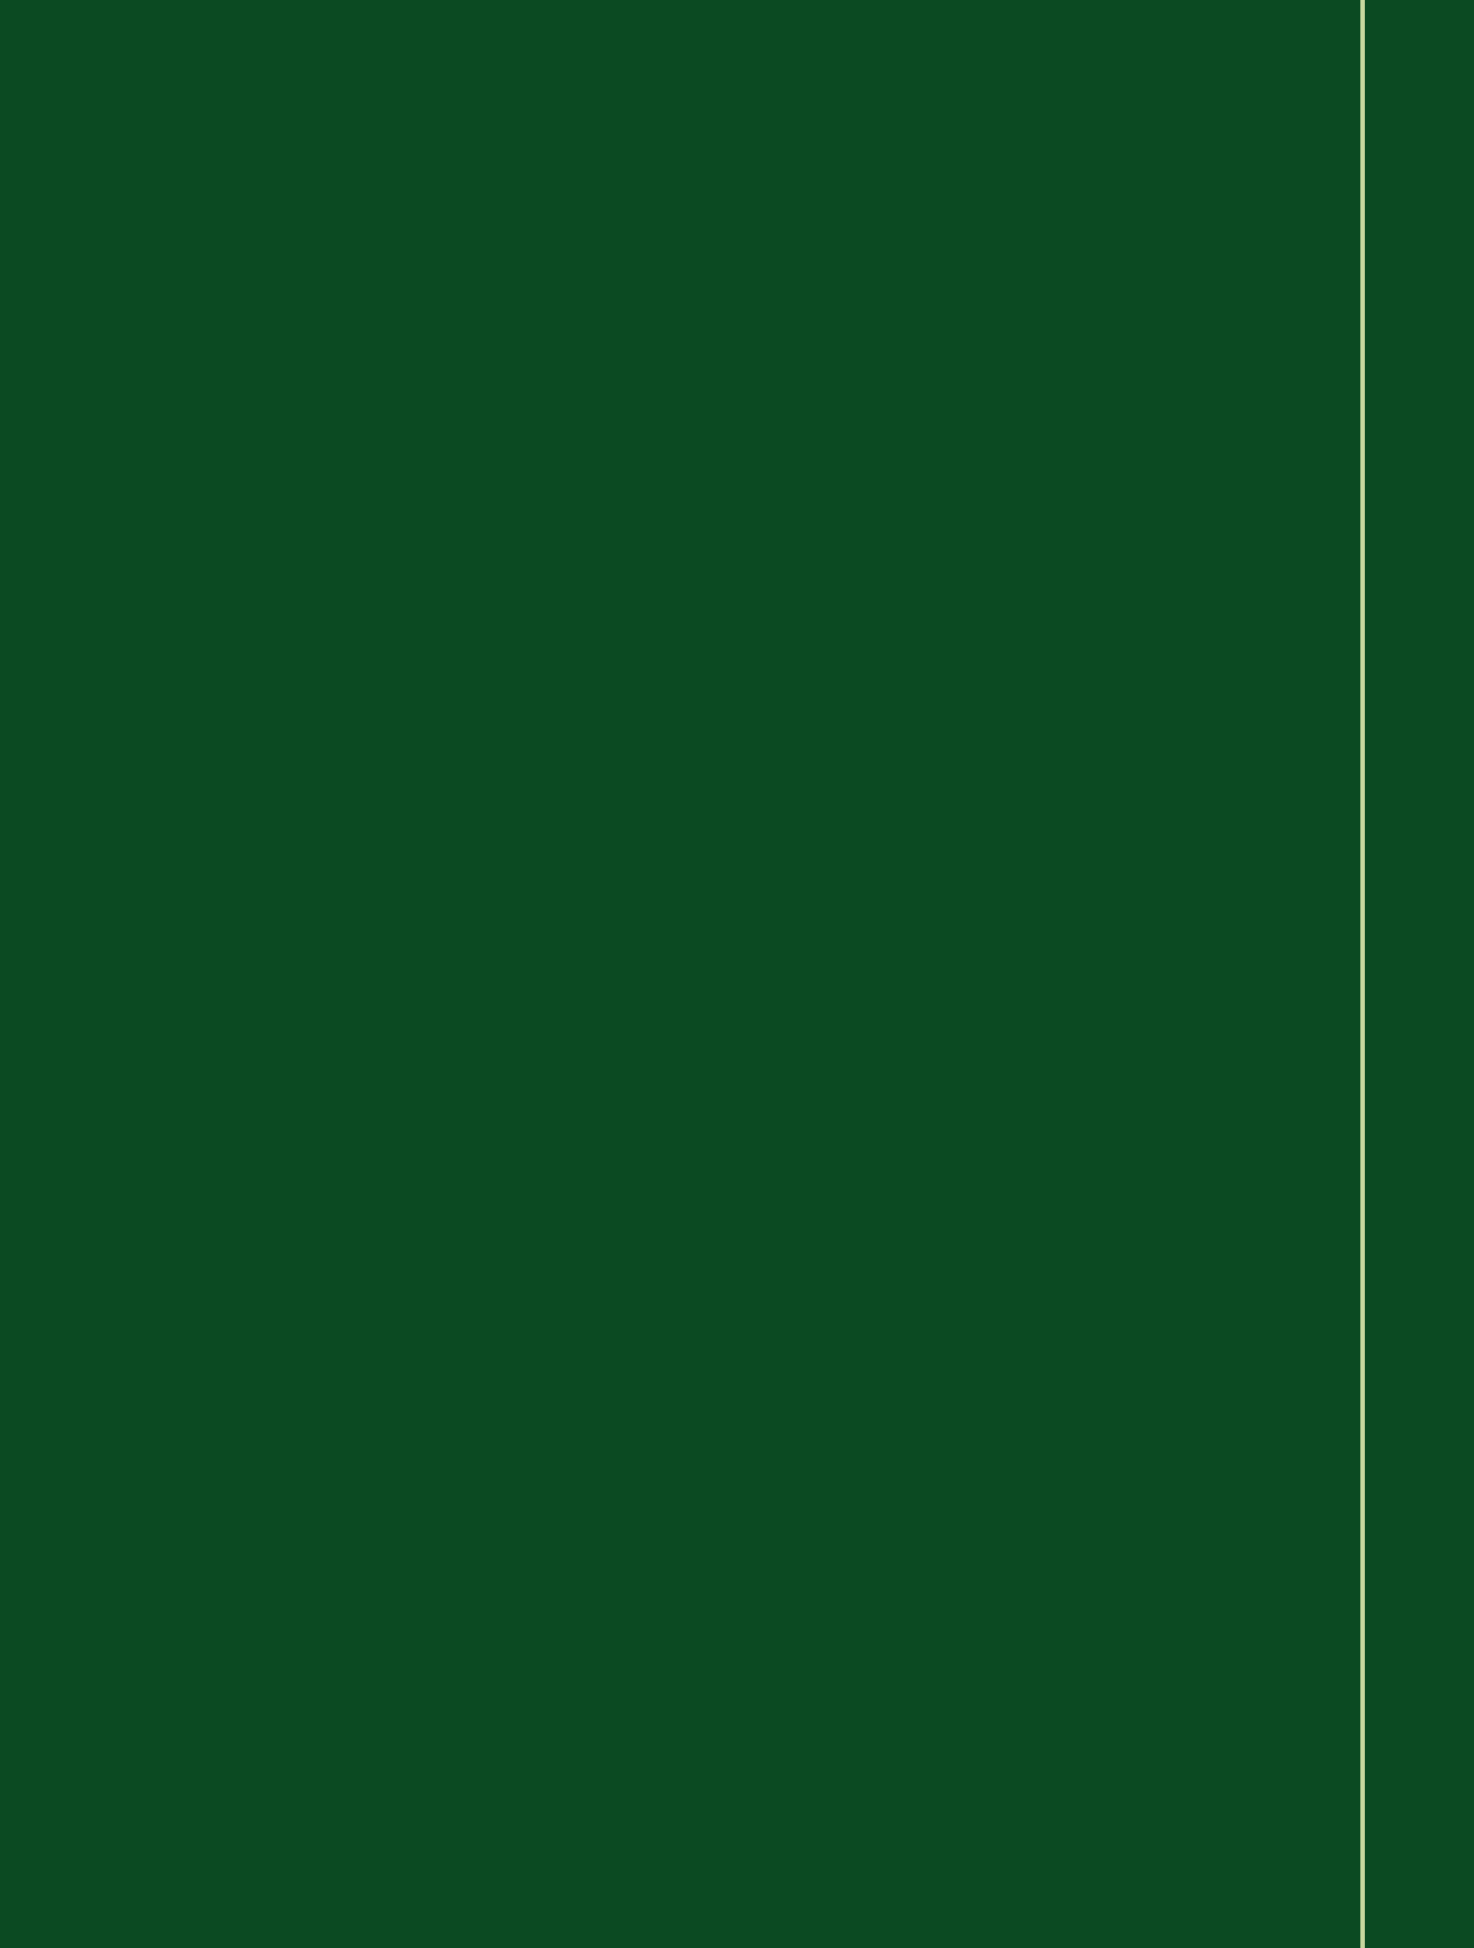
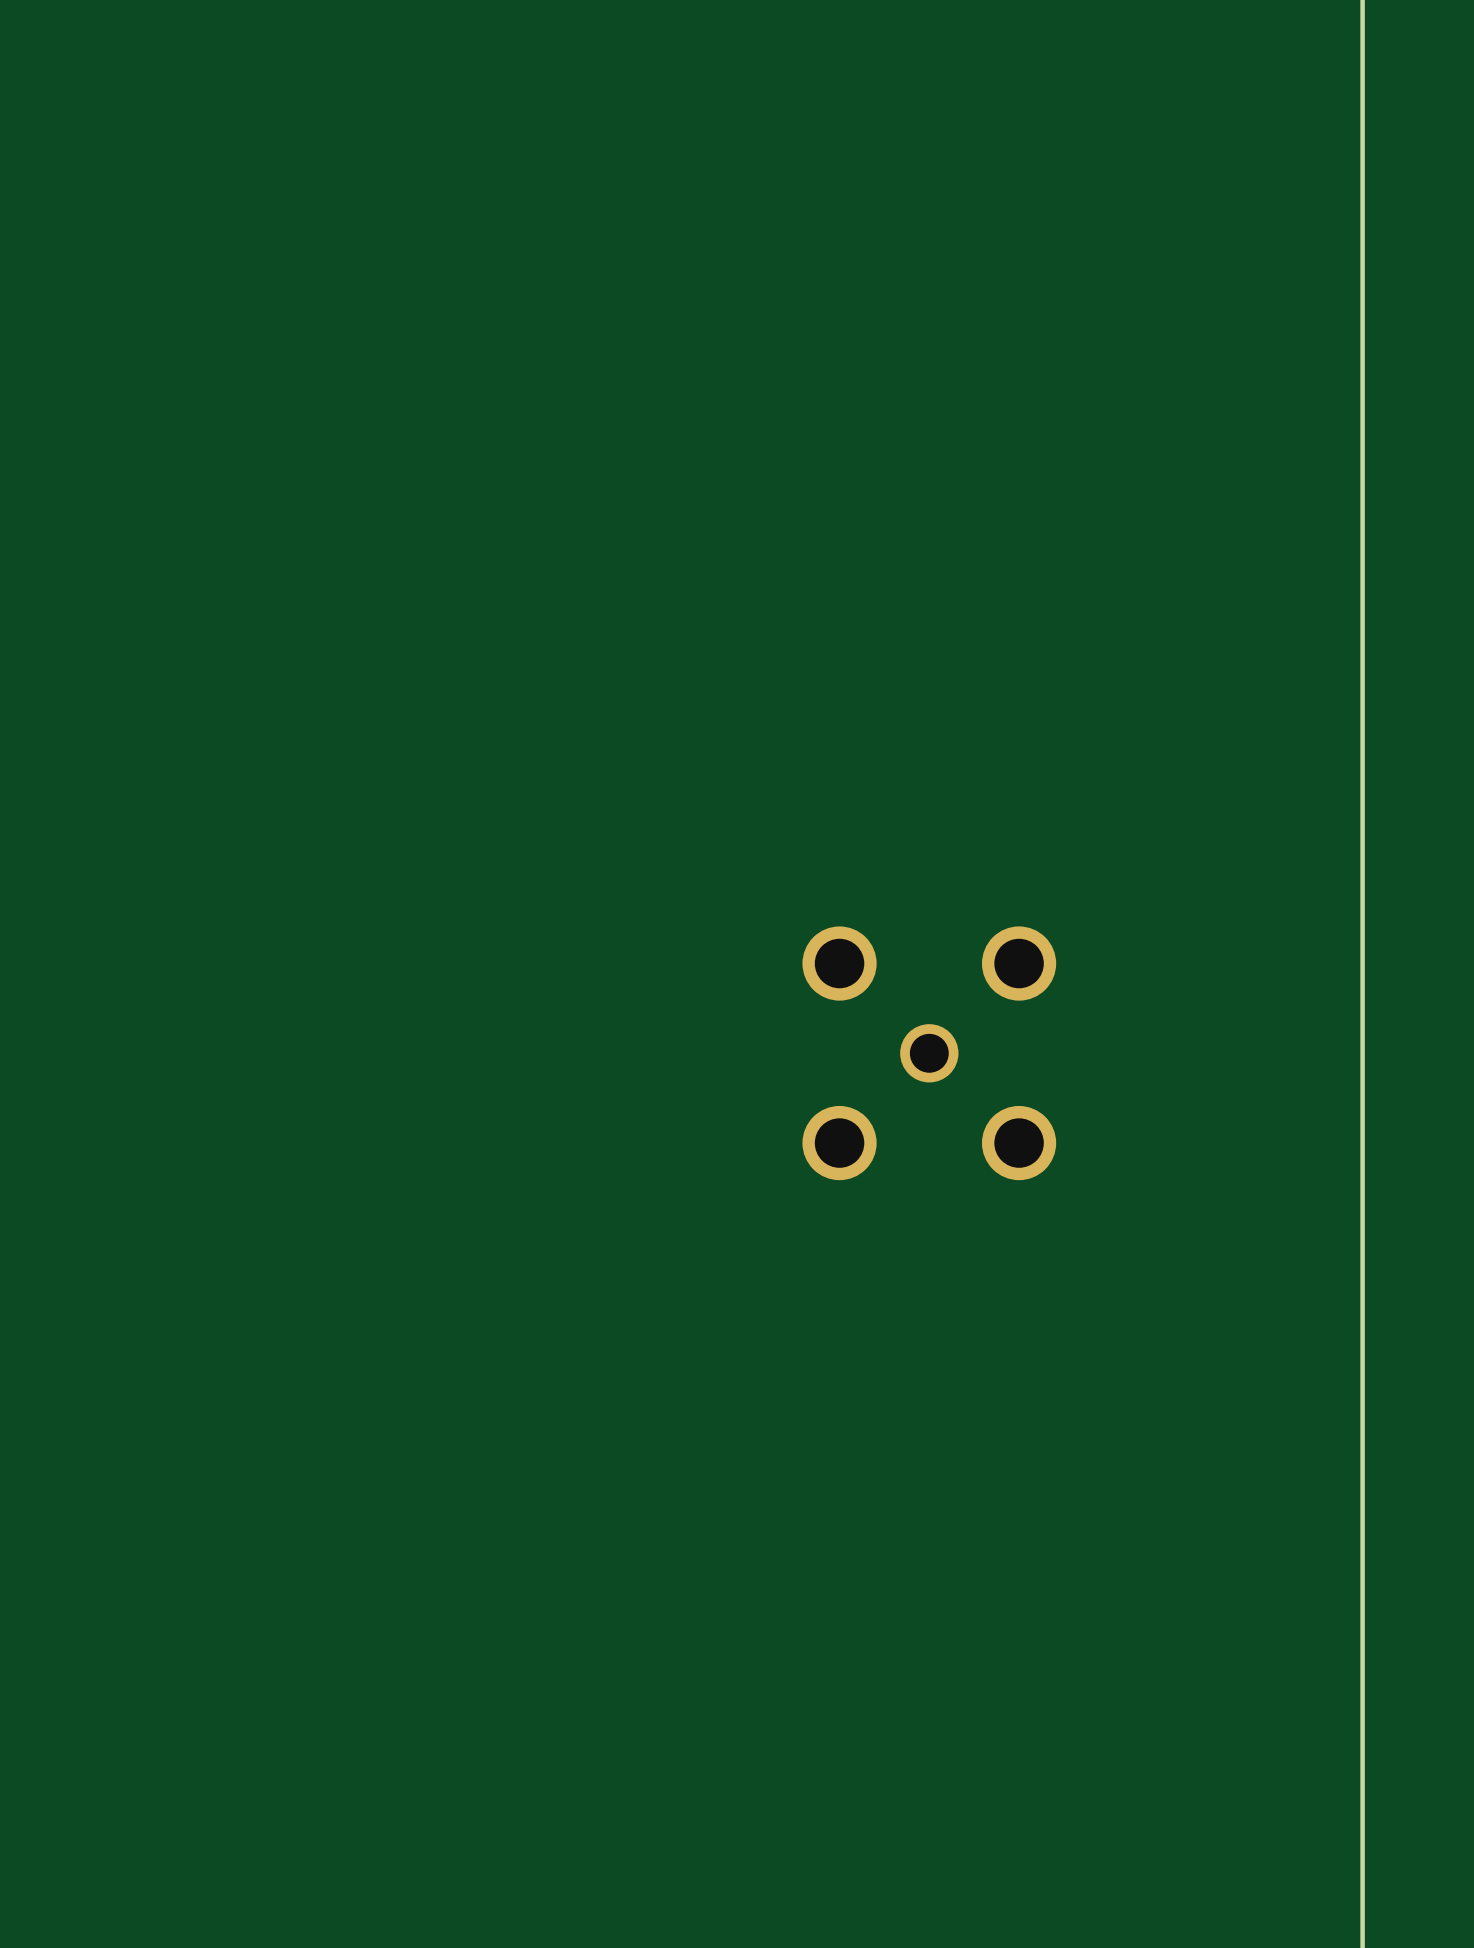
part: none -> (929, 1053)

